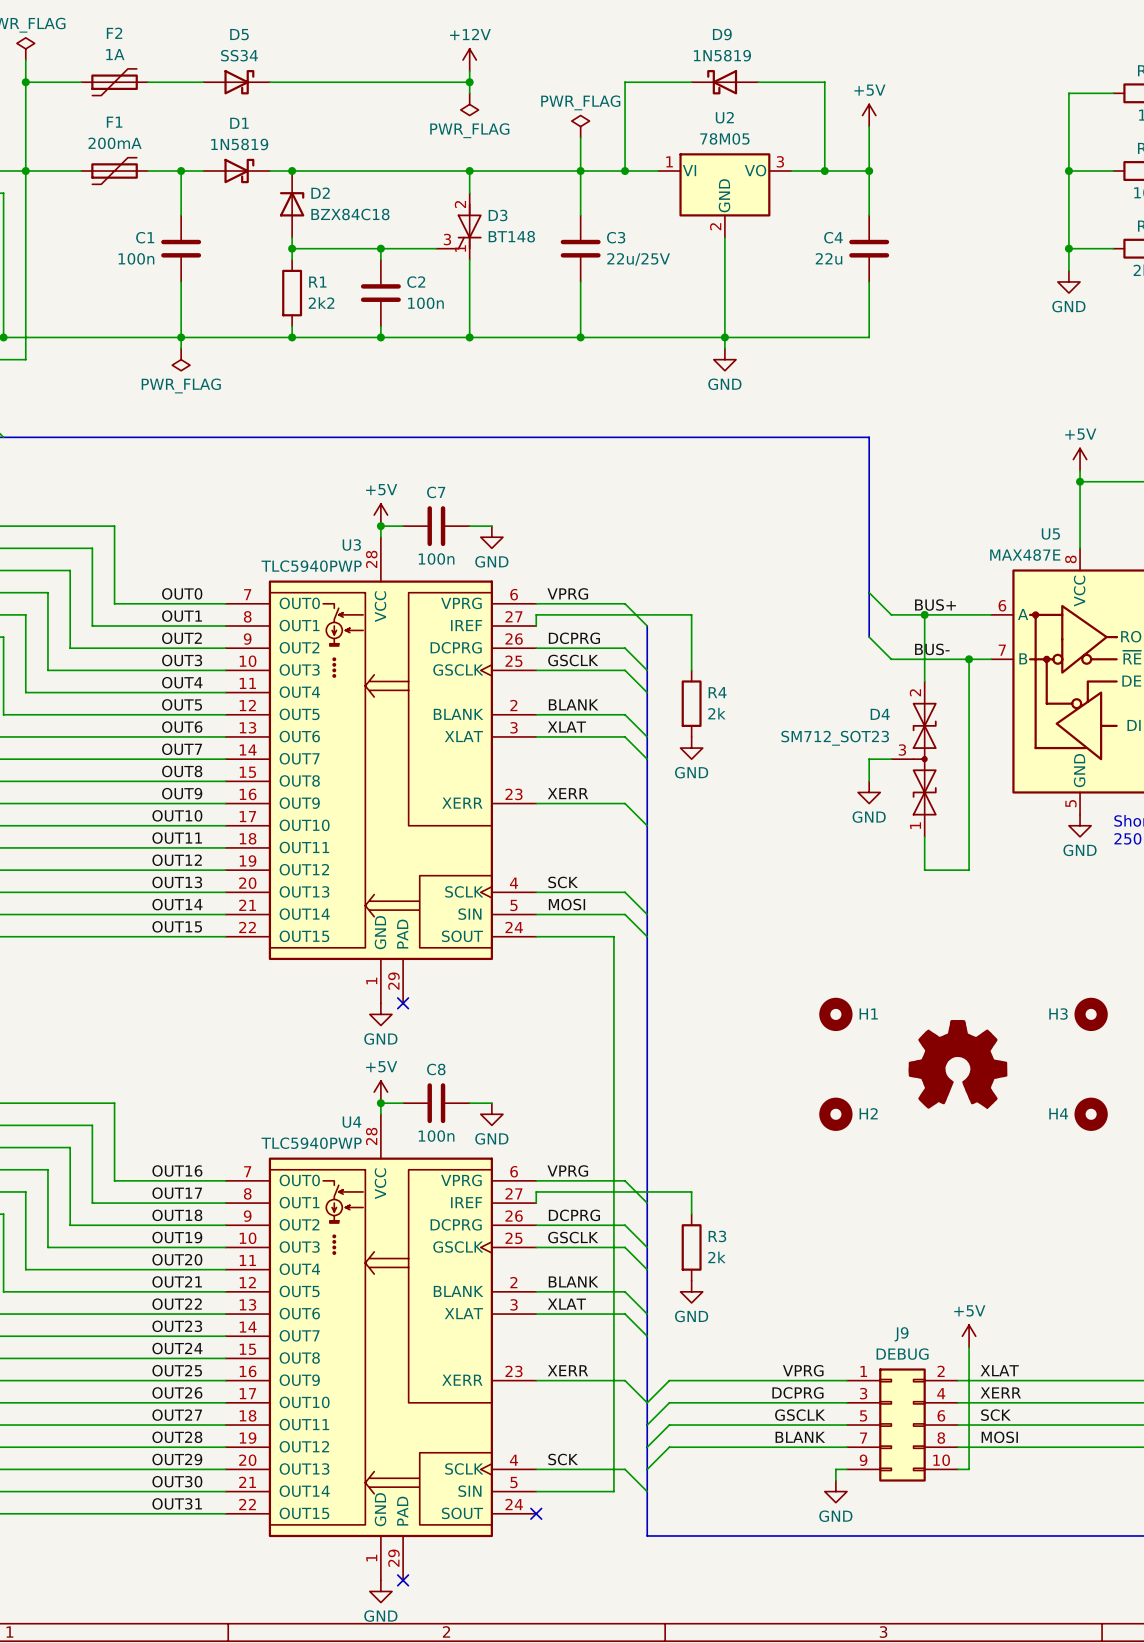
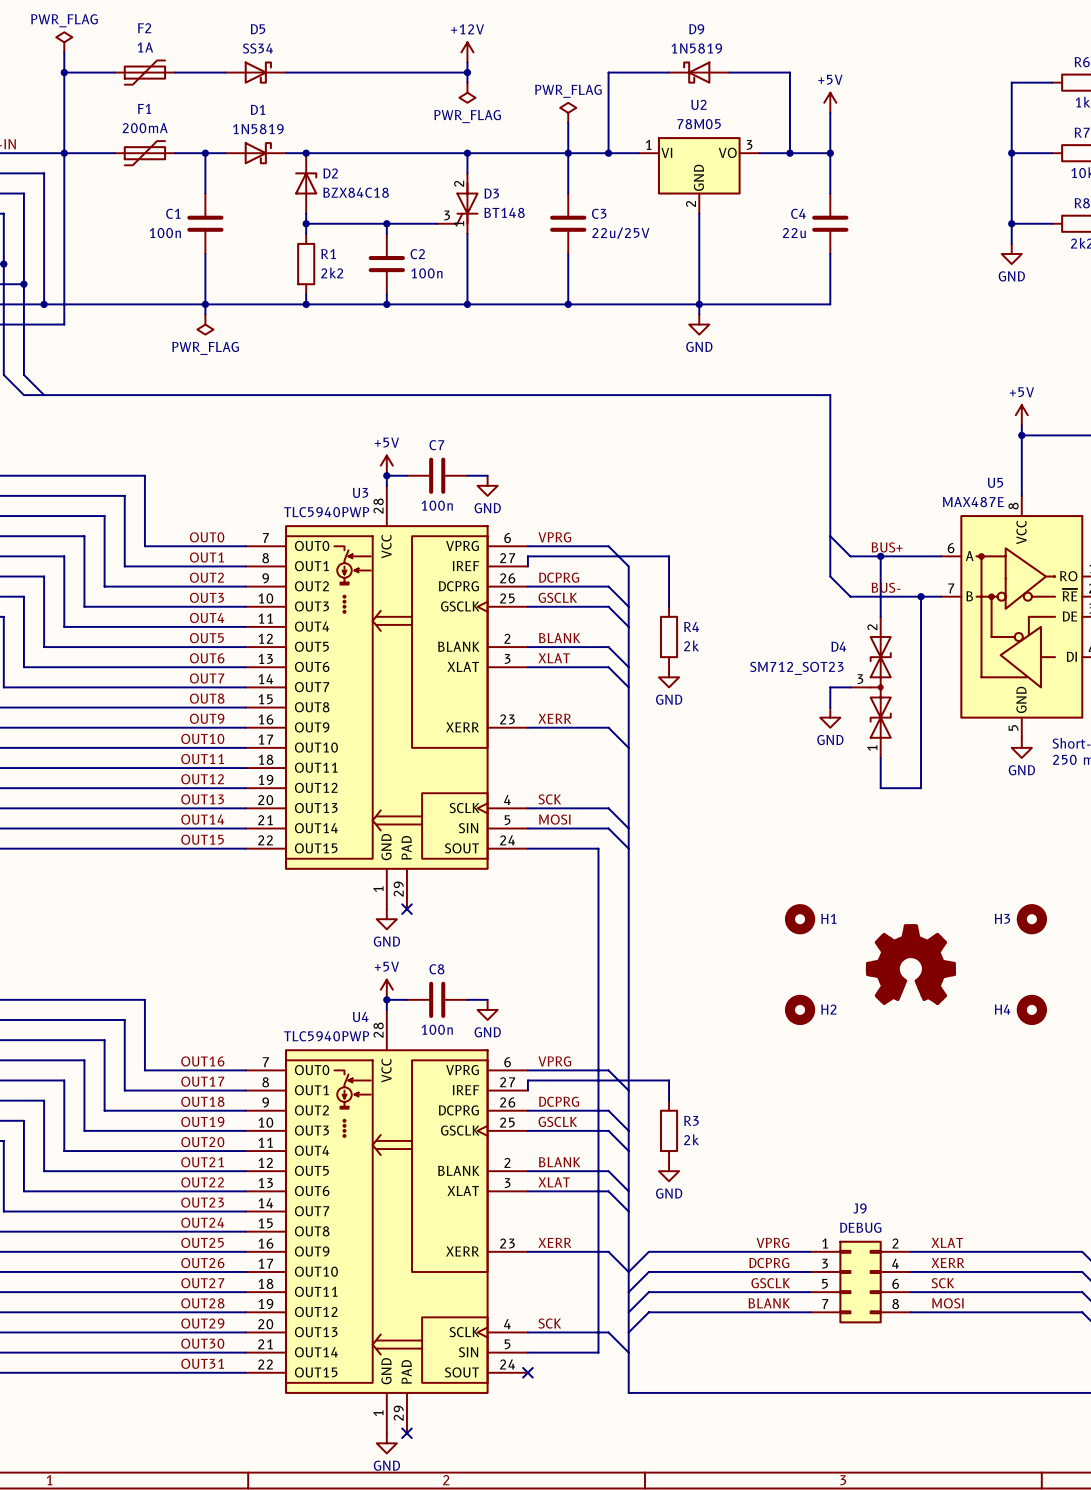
power symbol: +5V (969, 1336) -> none
wire: (969, 1347) (969, 1469) (957, 1469) -> none
J9 symbol: [846, 1368, 958, 1482] -> [810, 1240, 911, 1324]
wire: (846, 1469) (835, 1469) (835, 1480) -> none
power symbol: GND (835, 1491) -> none

